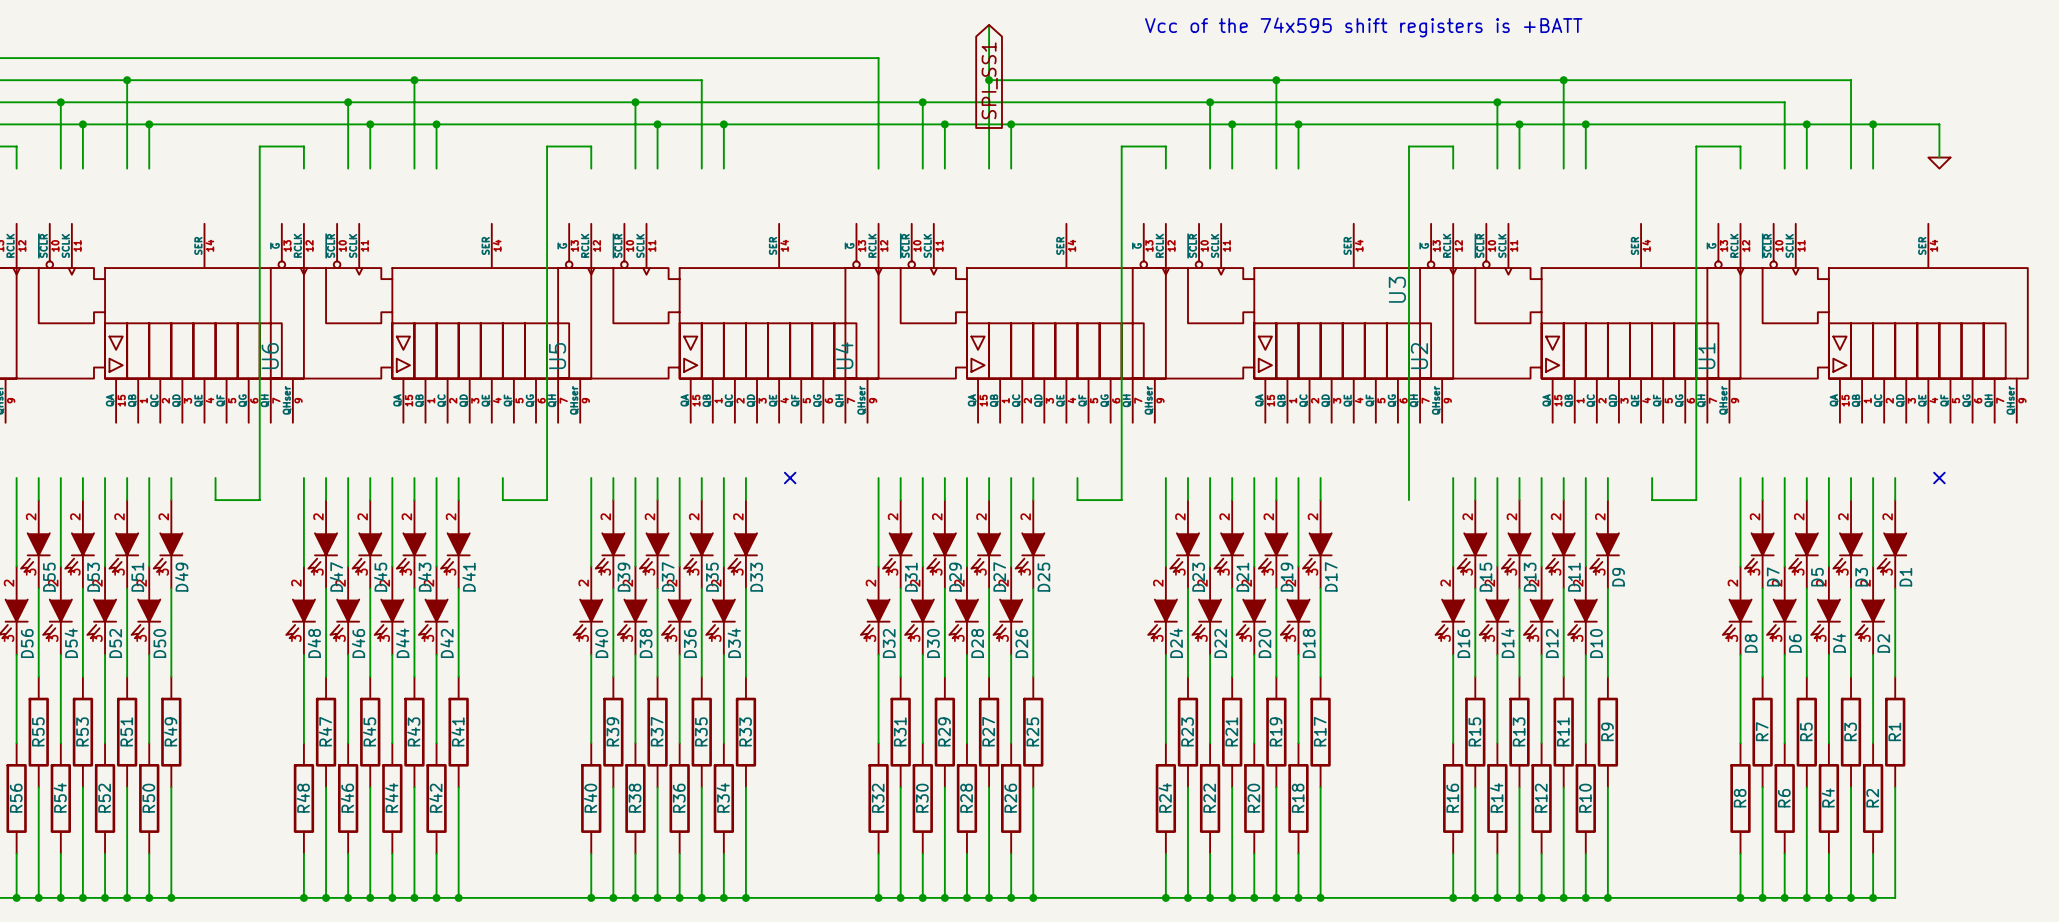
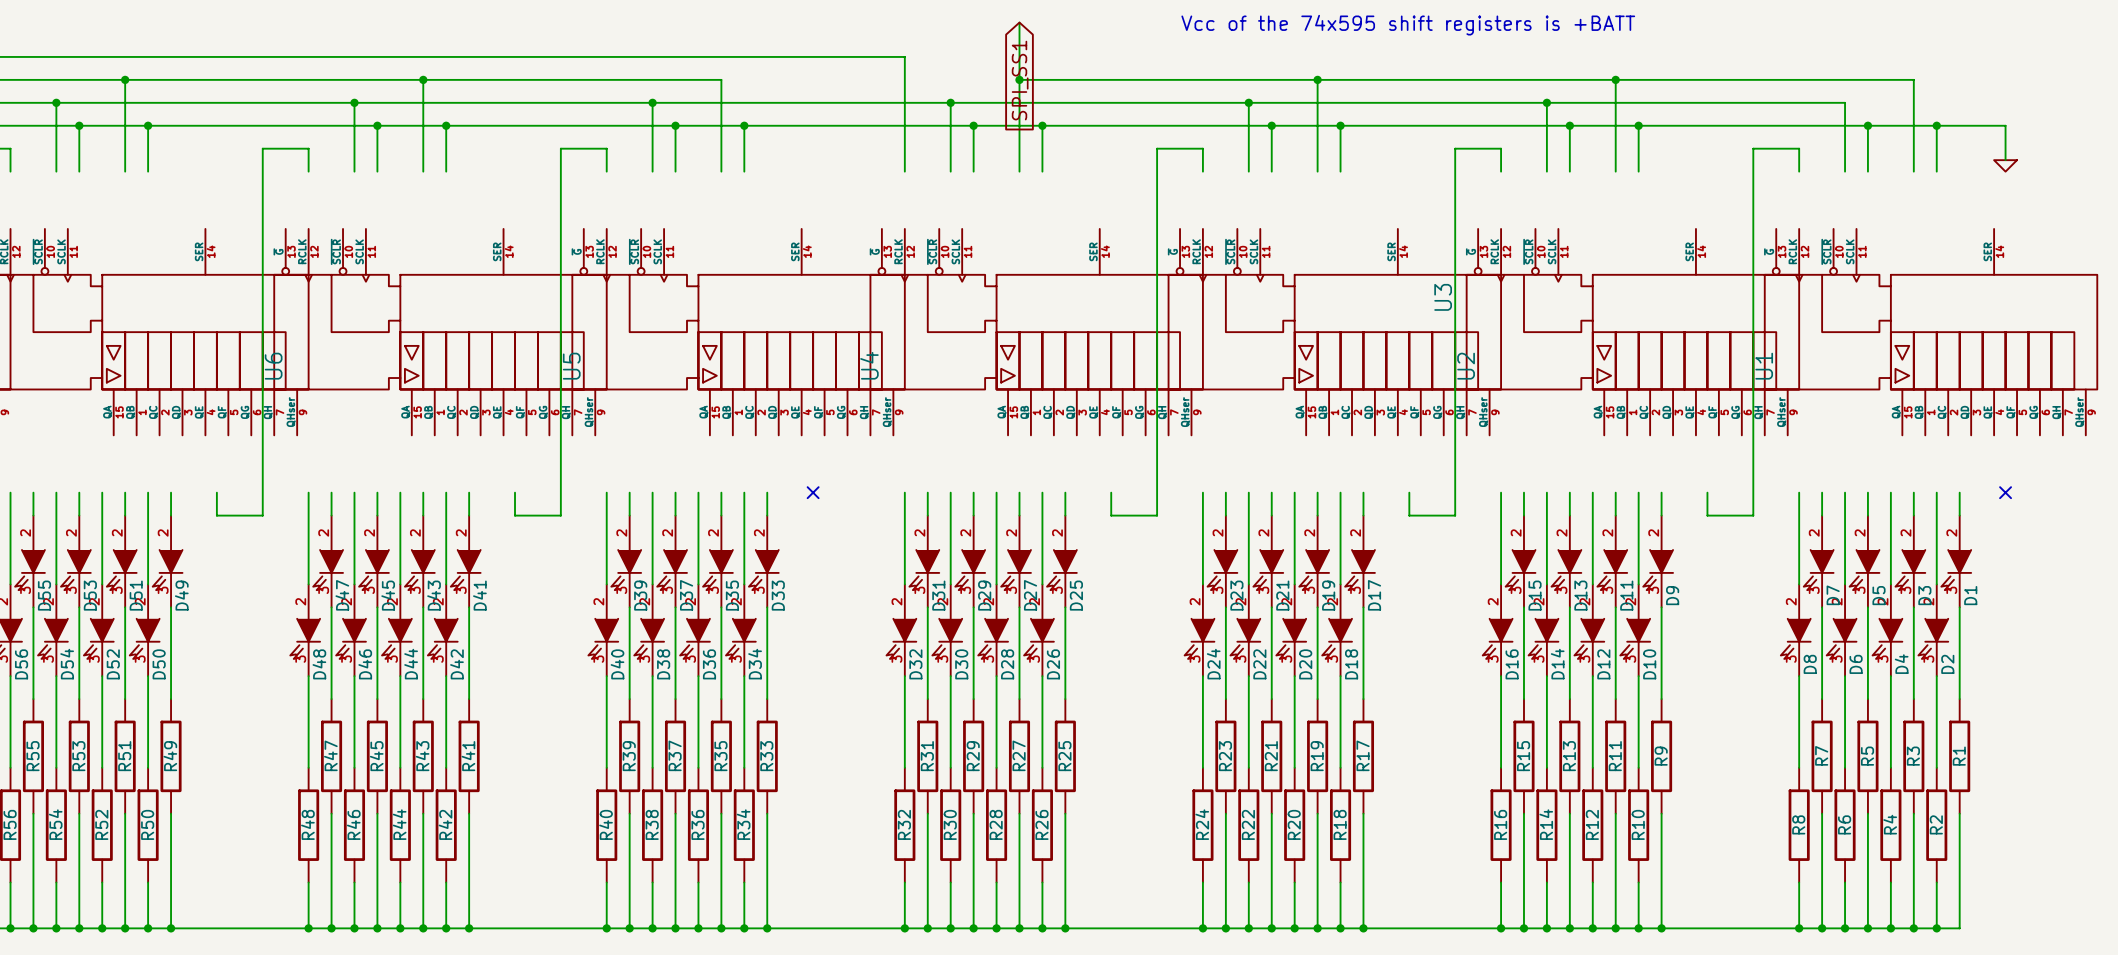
wire: none -> (1409, 492) (1409, 515) (1455, 515)

